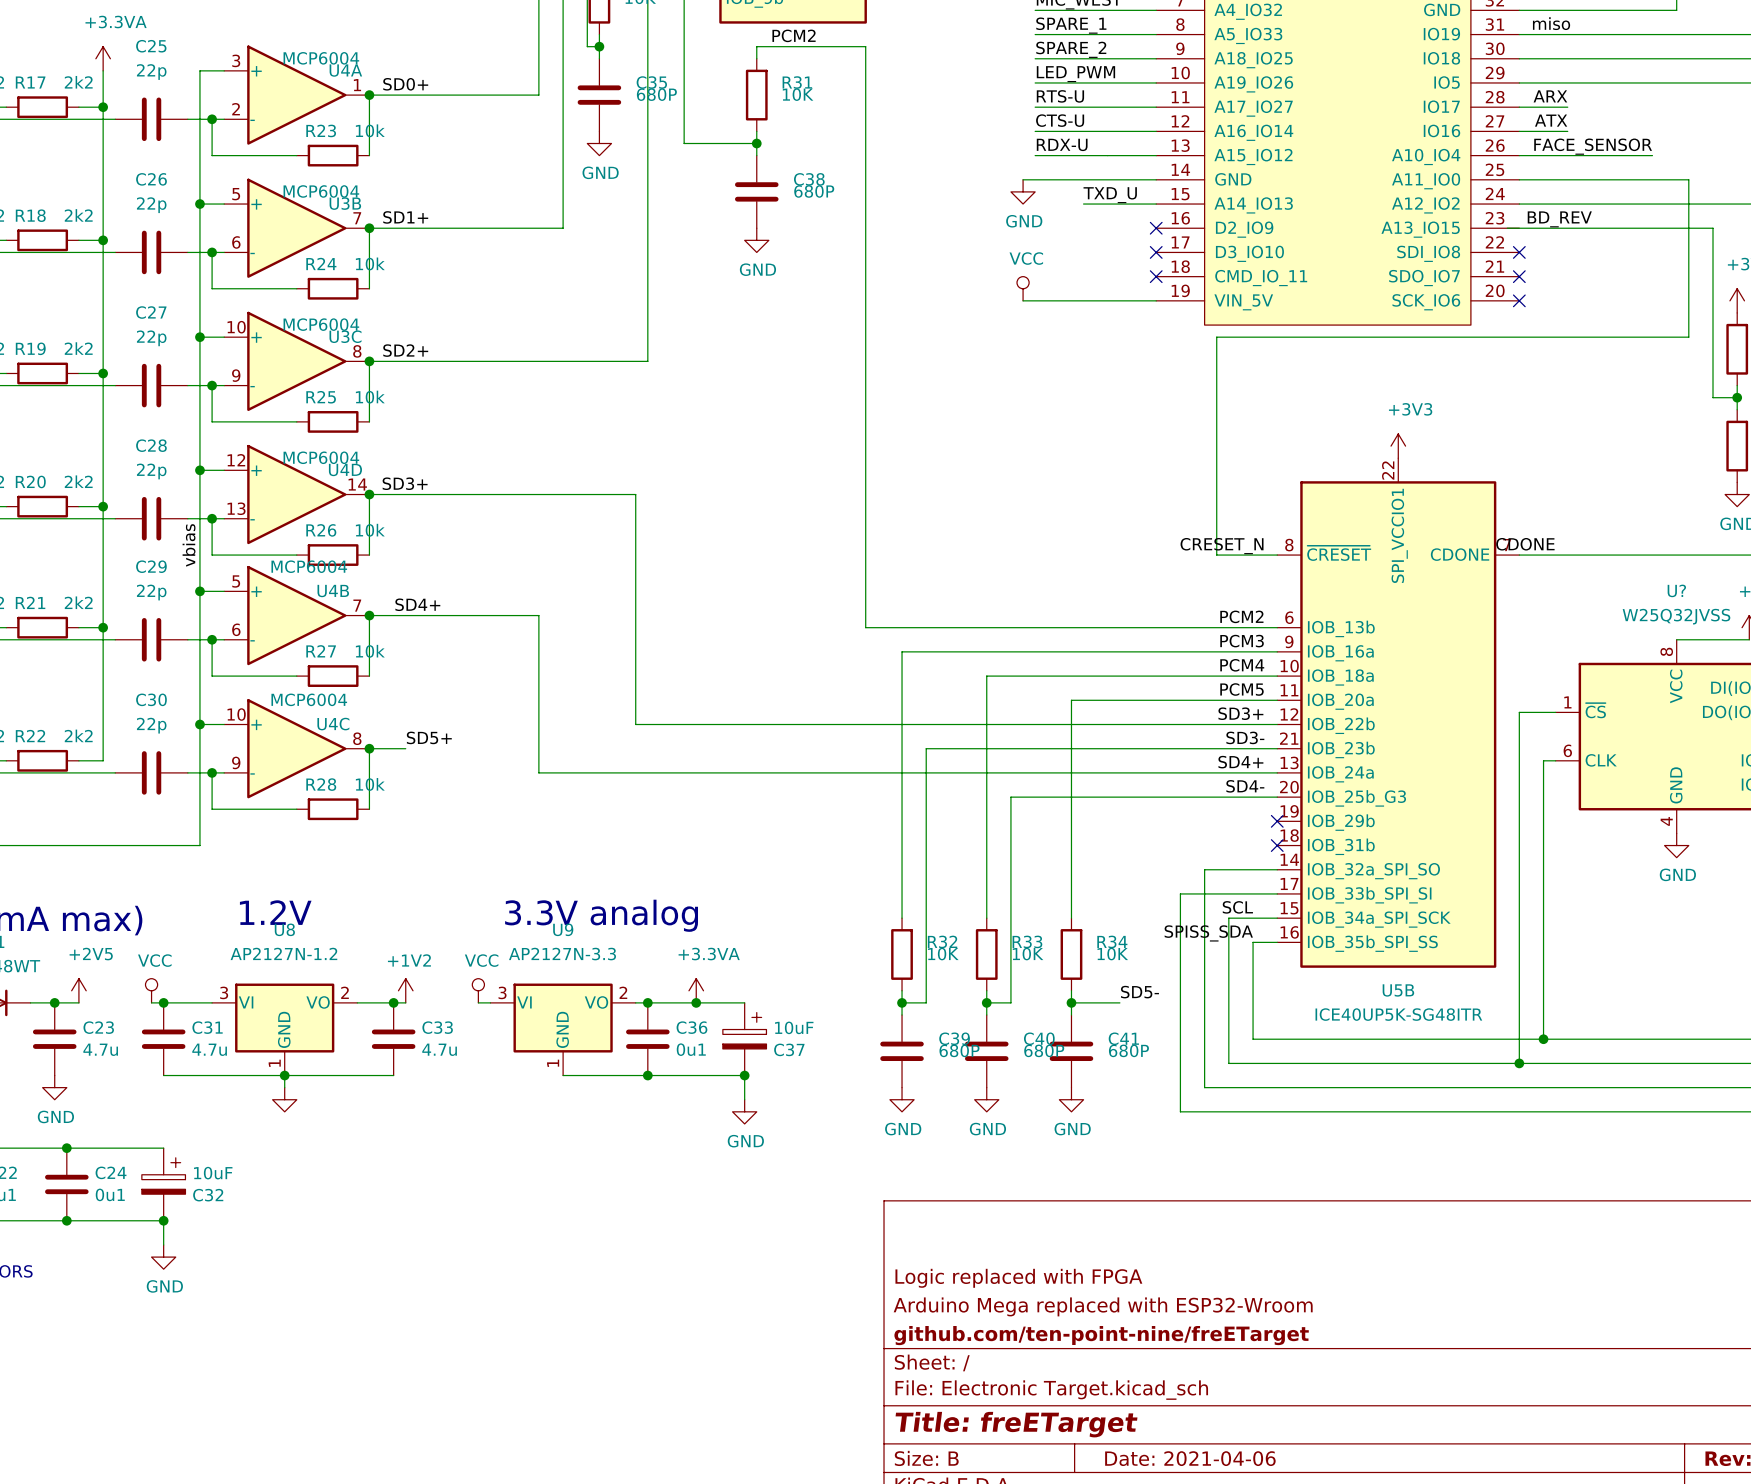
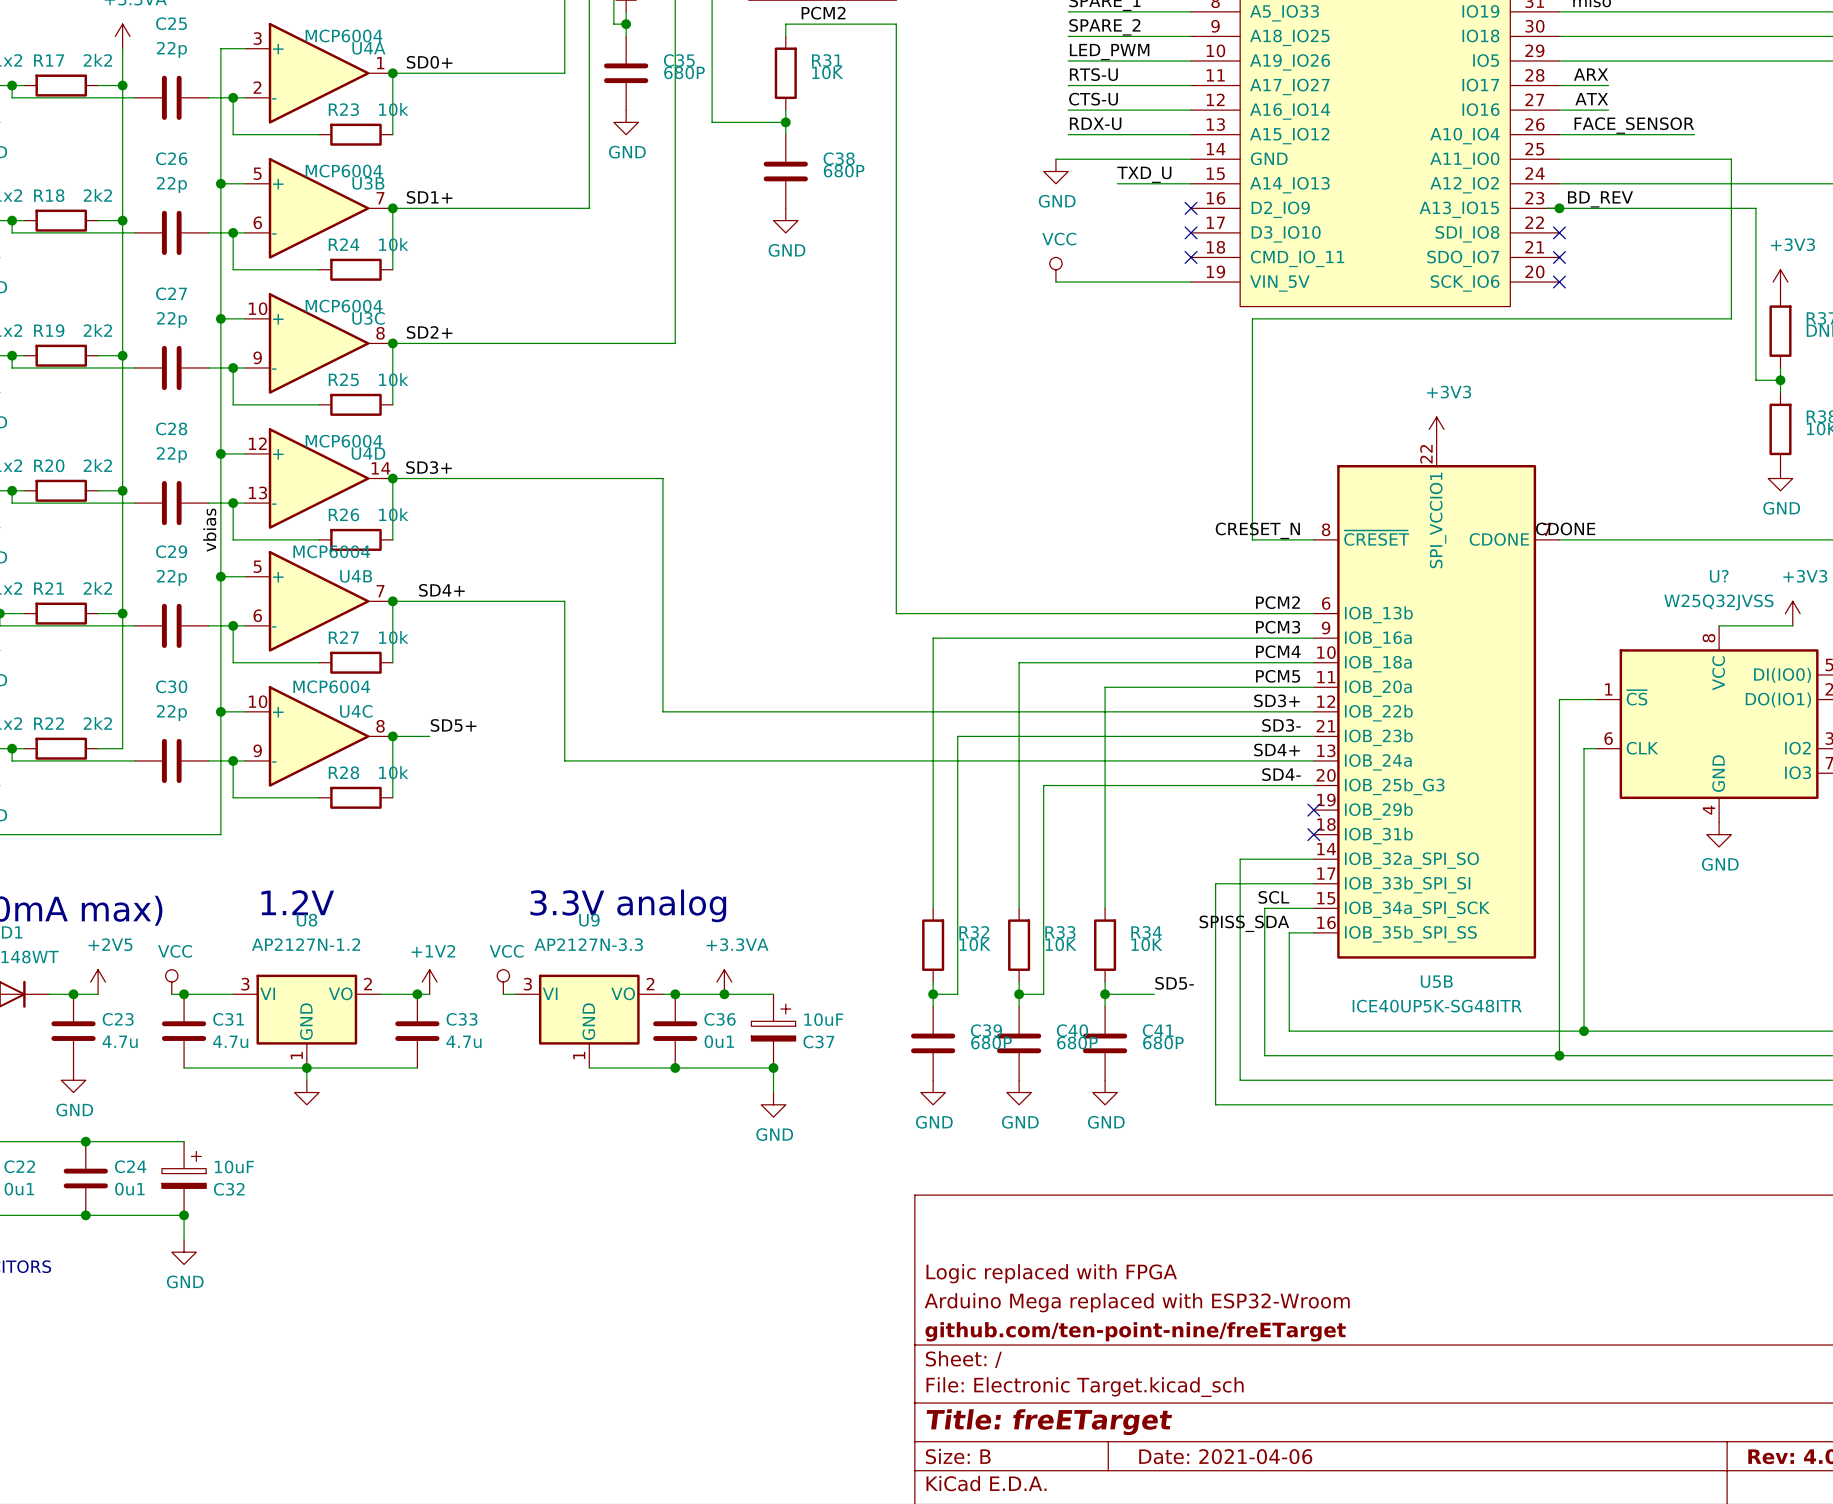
junction: none -> (1559, 208)

